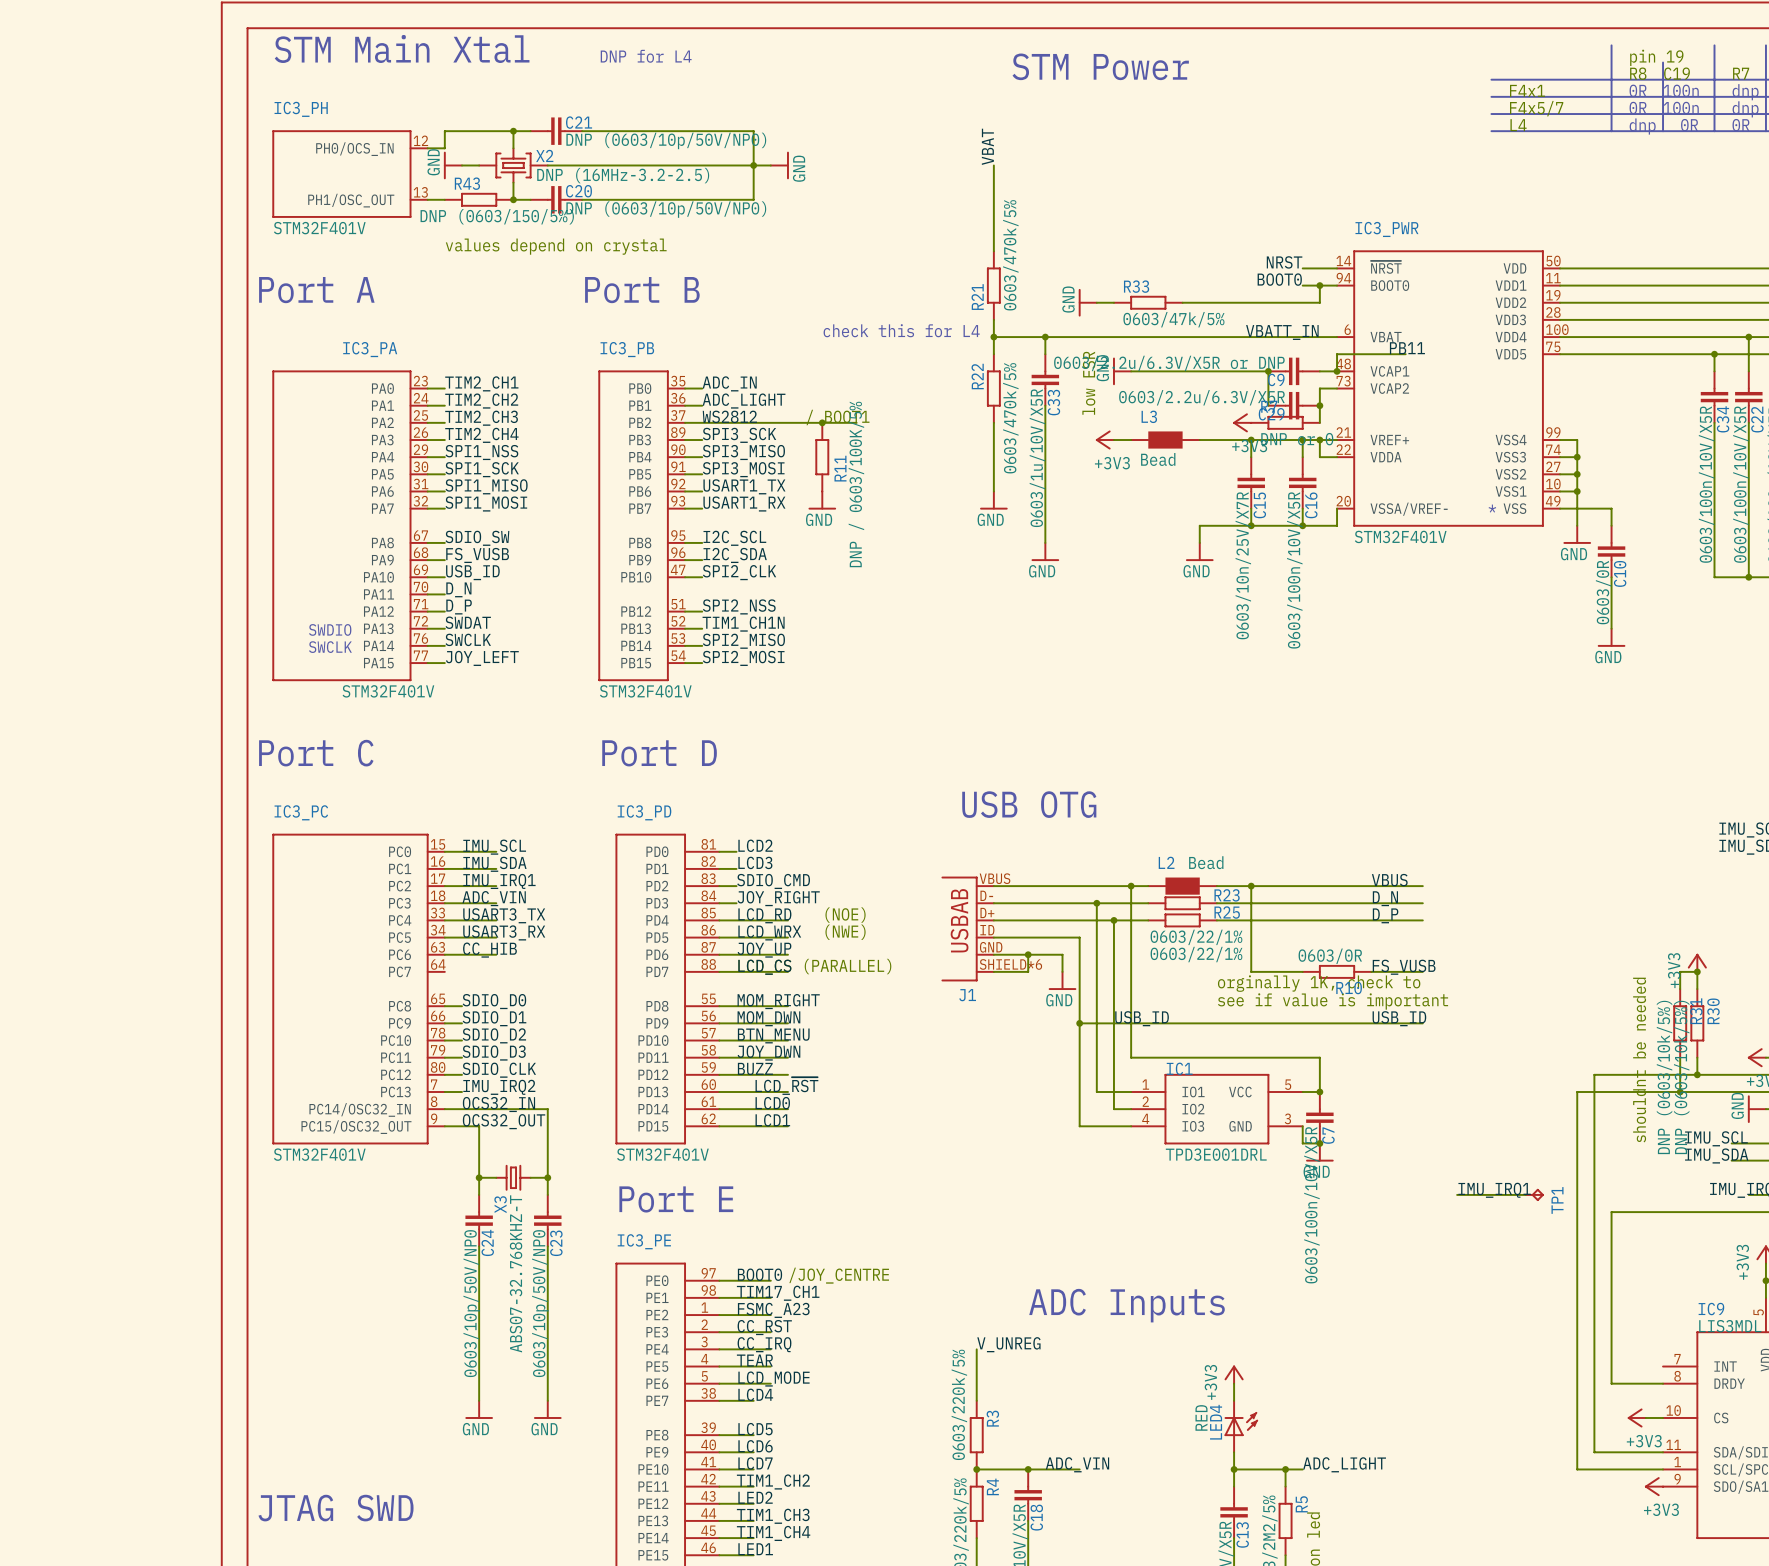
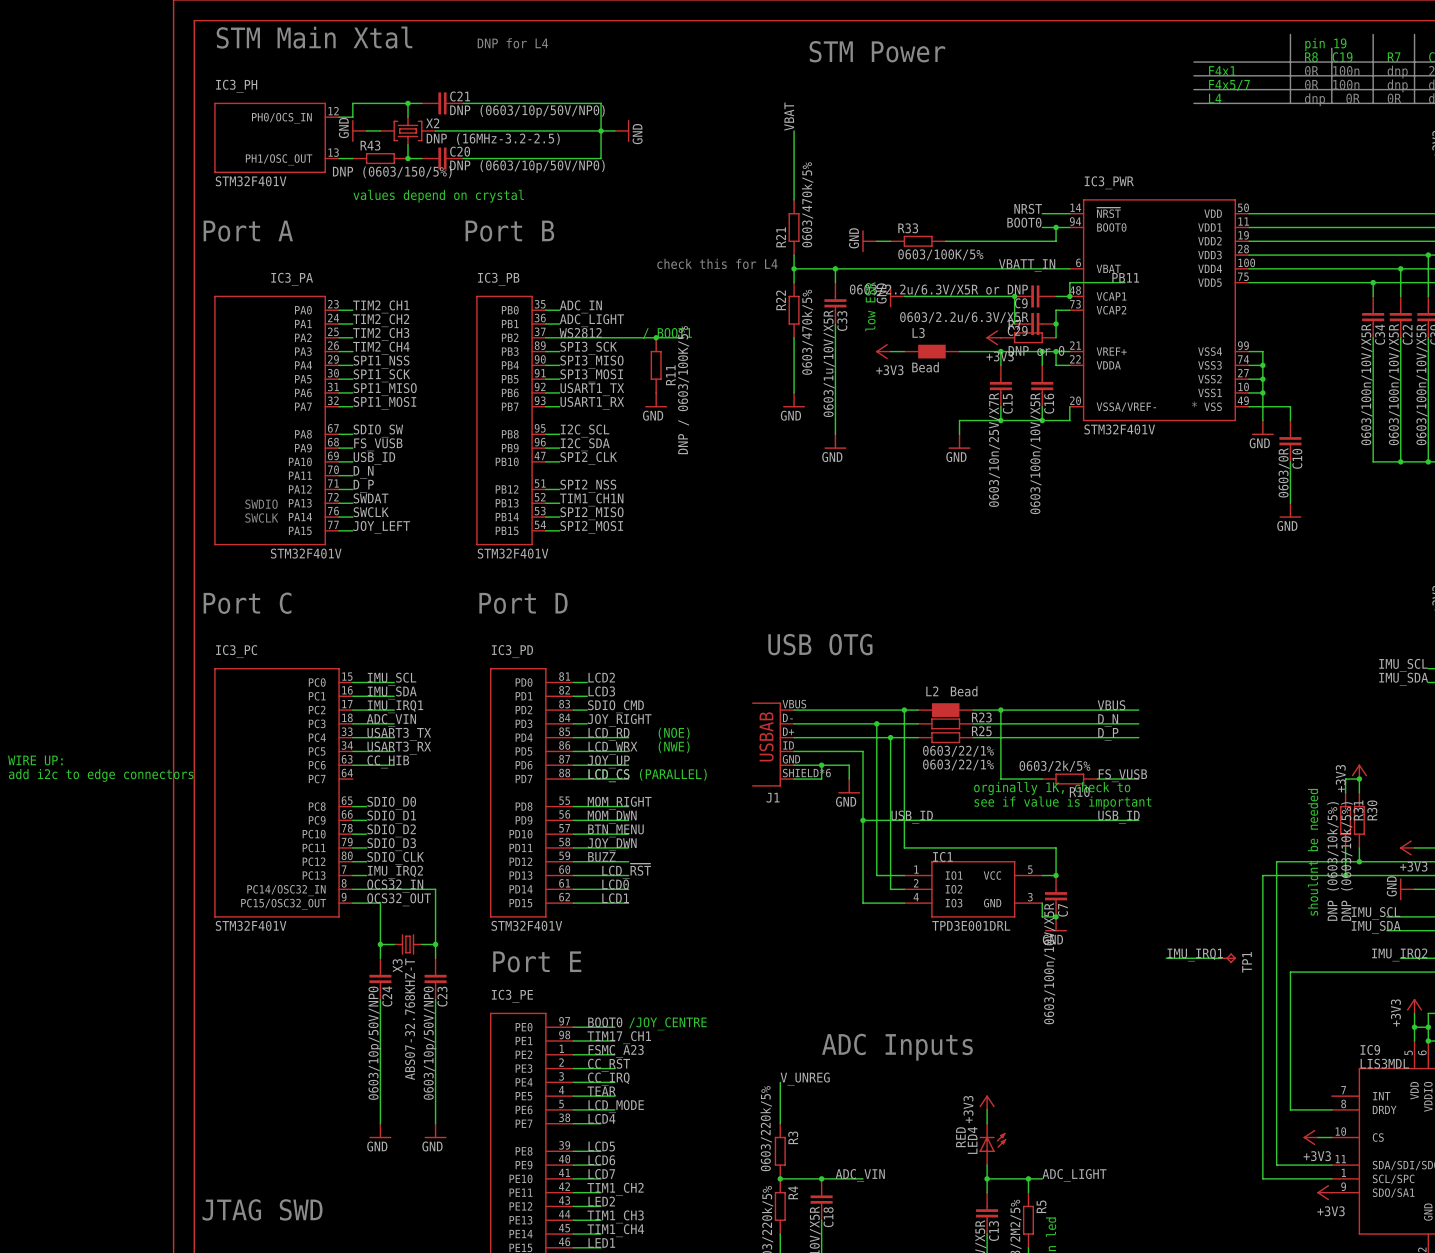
R33 value: 0603/47k/5% (1173, 319) -> 0603/100K/5% (940, 254)
text: none -> WIRE UP: (35, 760)
R10 value: 0603/0R (1330, 956) -> 0603/2k/5% (1054, 766)
text: none -> add i2c to edge connectors (101, 775)

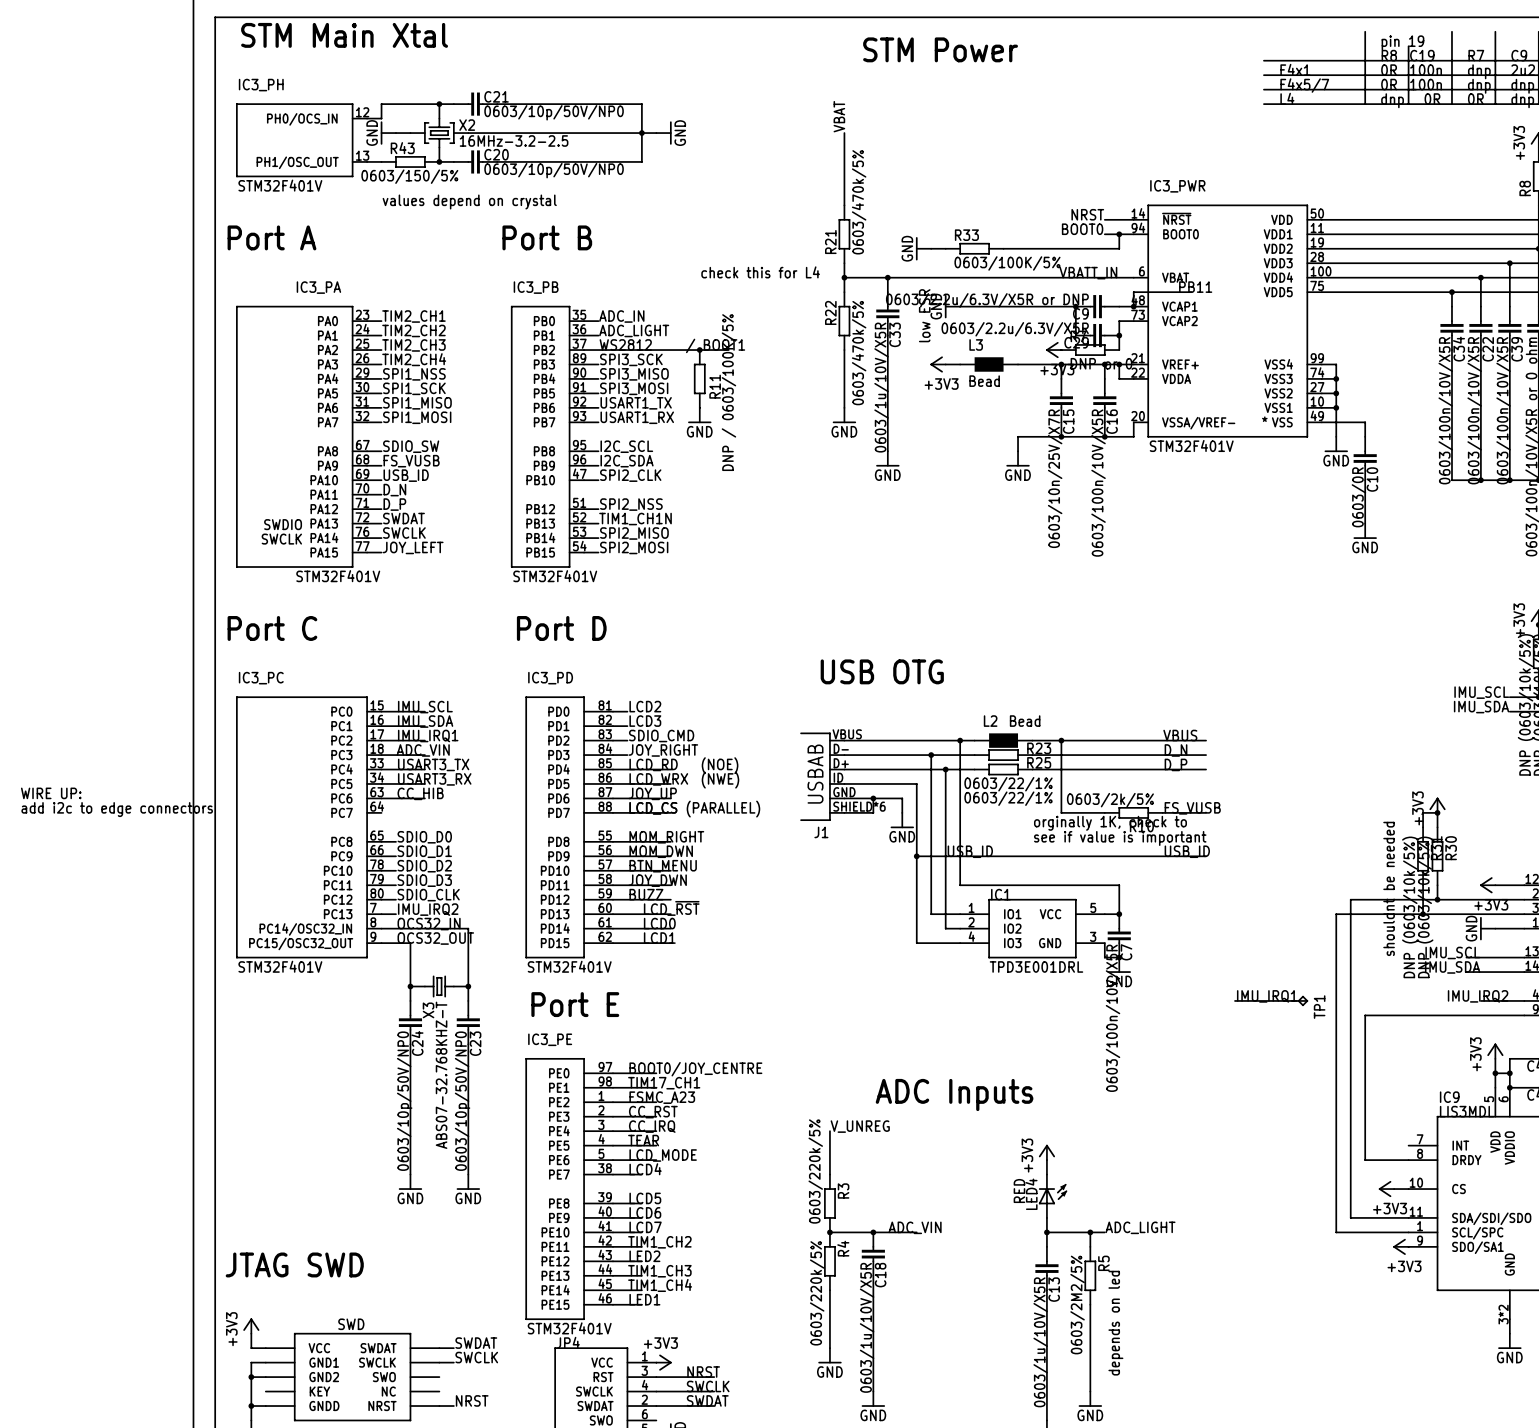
text: DNP for L4 (512, 43) -> none
C21 value: DNP (0603/10p/50V/NP0) (527, 111) -> 0603/10p/50V/NP0 (554, 112)
X2 value: DNP (16MHz-3.2-2.5) (493, 139) -> 16MHz-3.2-2.5 (514, 140)
C20 value: DNP (0603/10p/50V/NP0) (527, 166) -> 0603/10p/50V/NP0 (554, 170)
R43 value: DNP (0603/150/5%) (392, 172) -> 0603/150/5% (409, 176)

